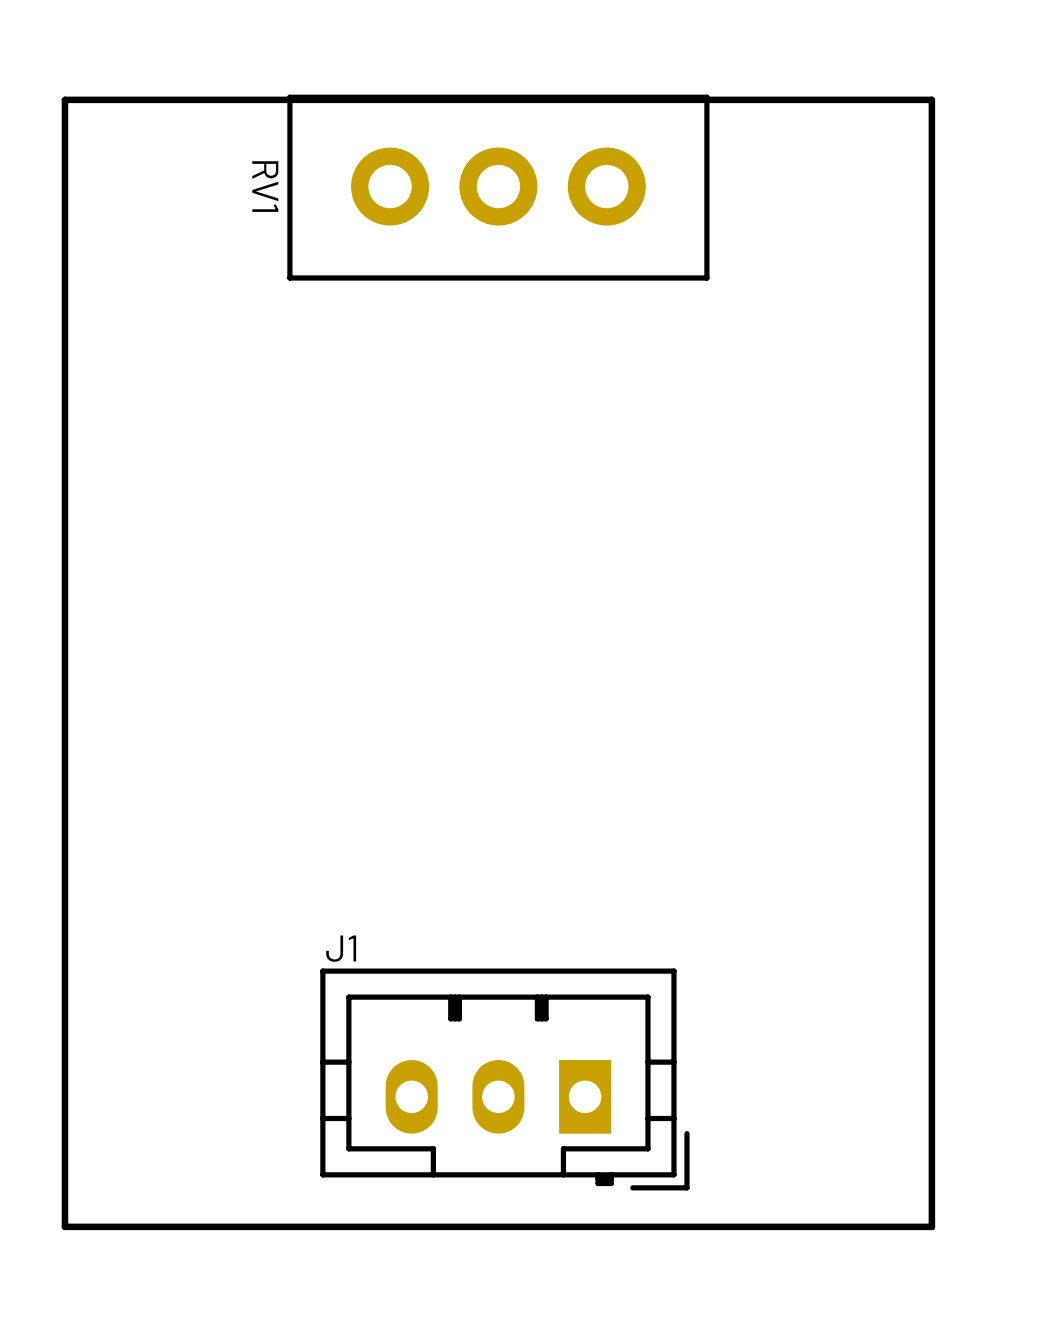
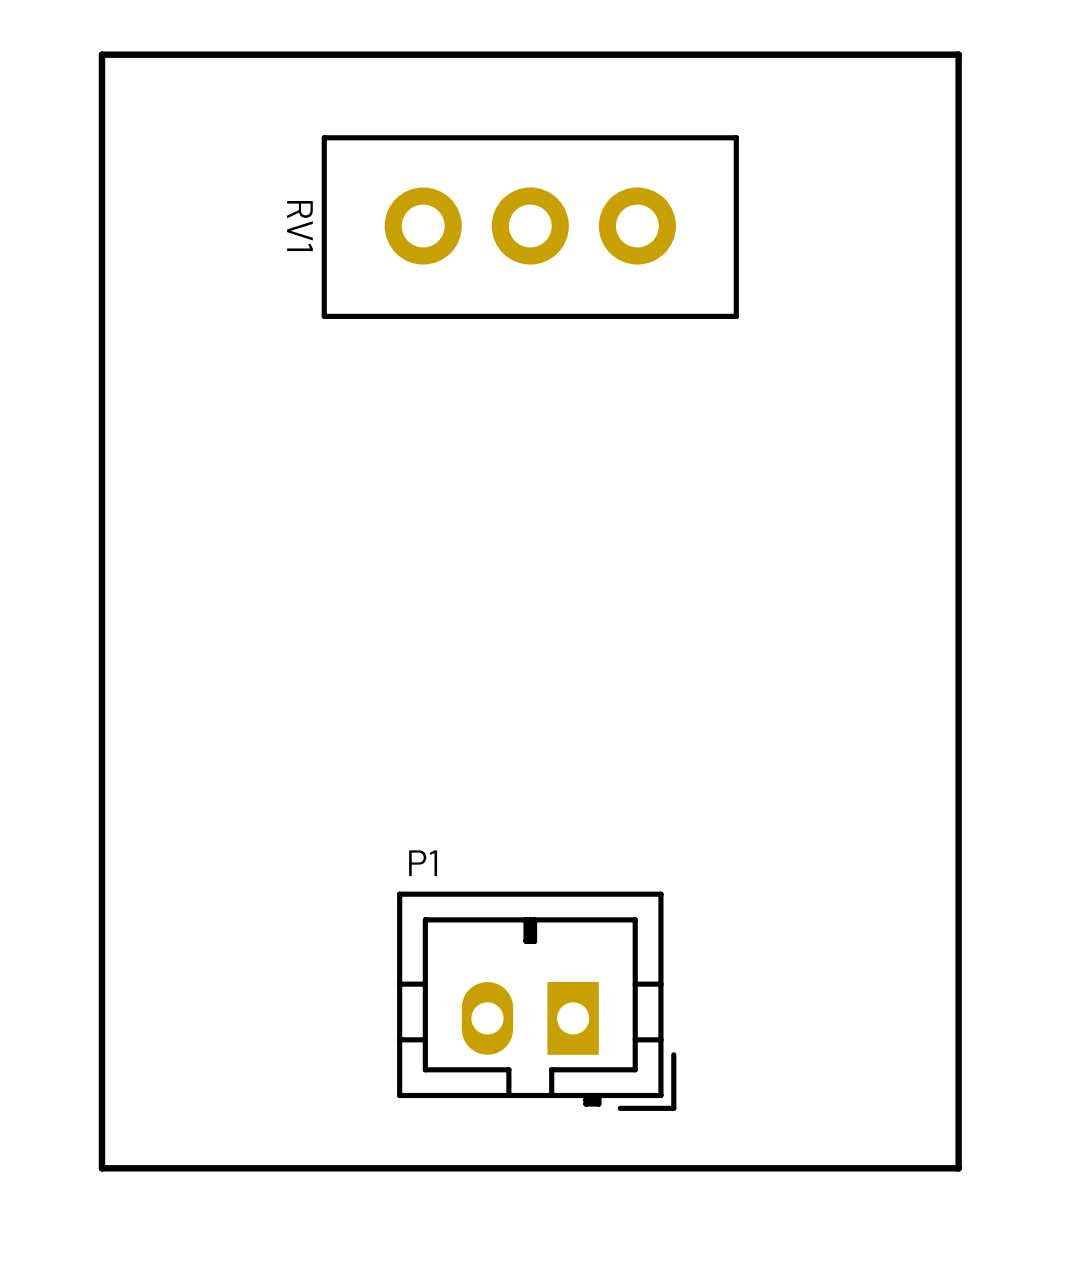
RV1 position: (498, 187) -> (530, 227)
P1: none -> (536, 1001)
J1: (504, 1079) -> none

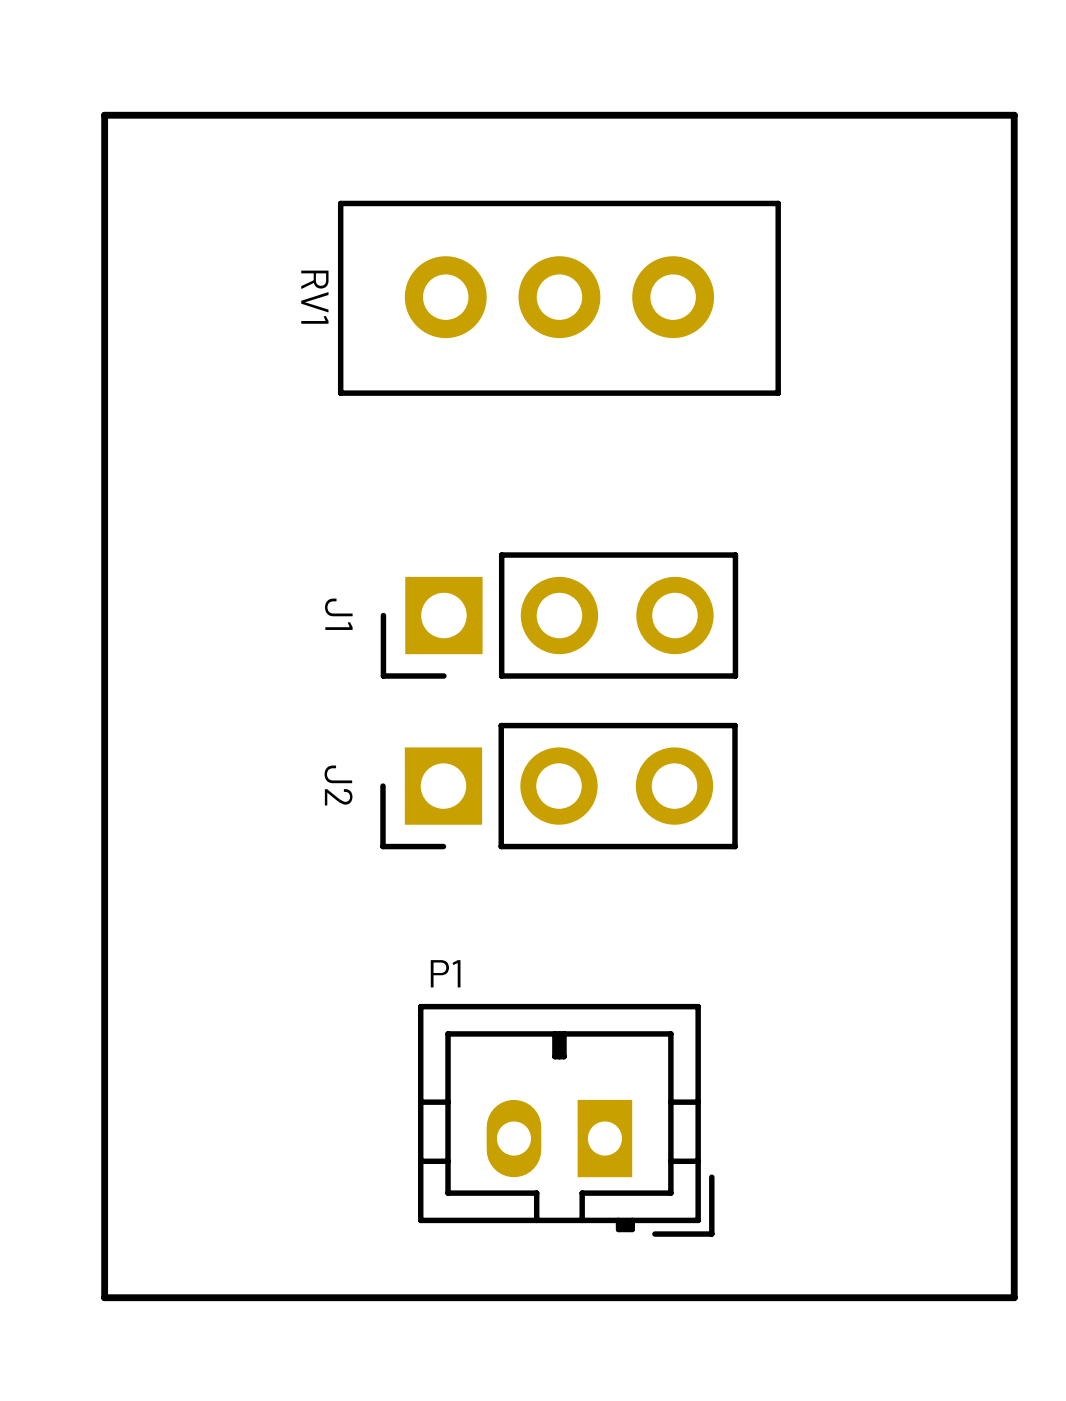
J1: none -> (559, 615)
J2: none -> (558, 786)

